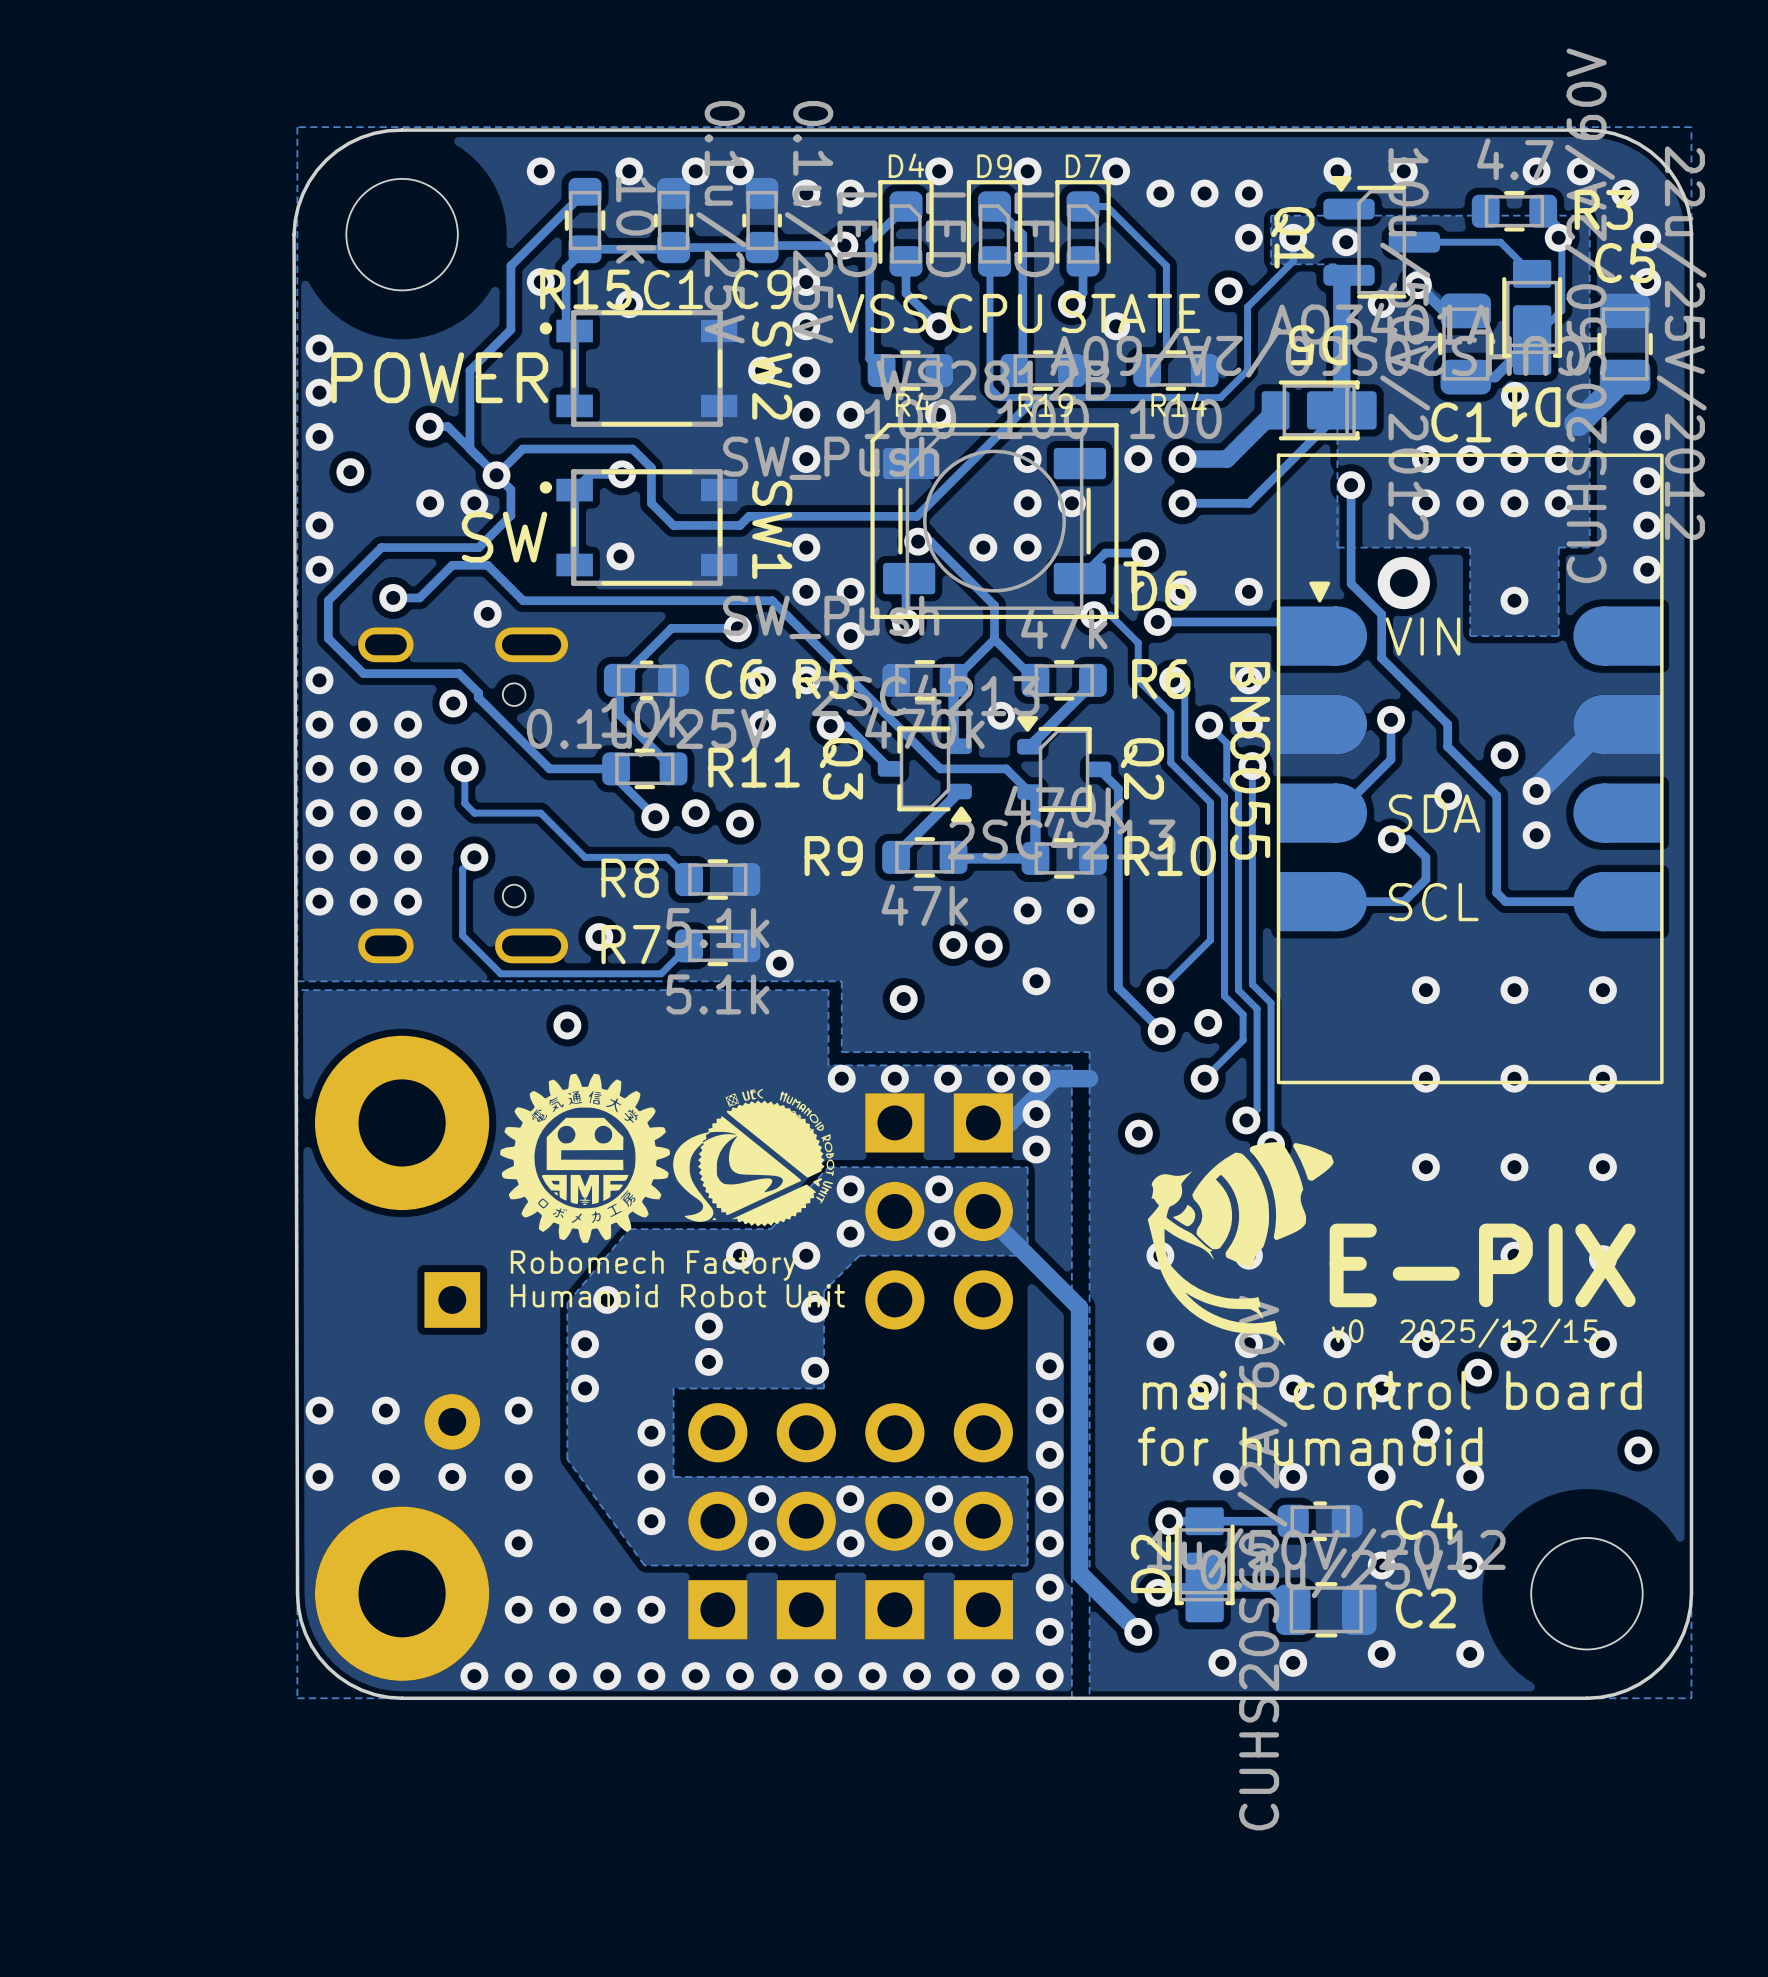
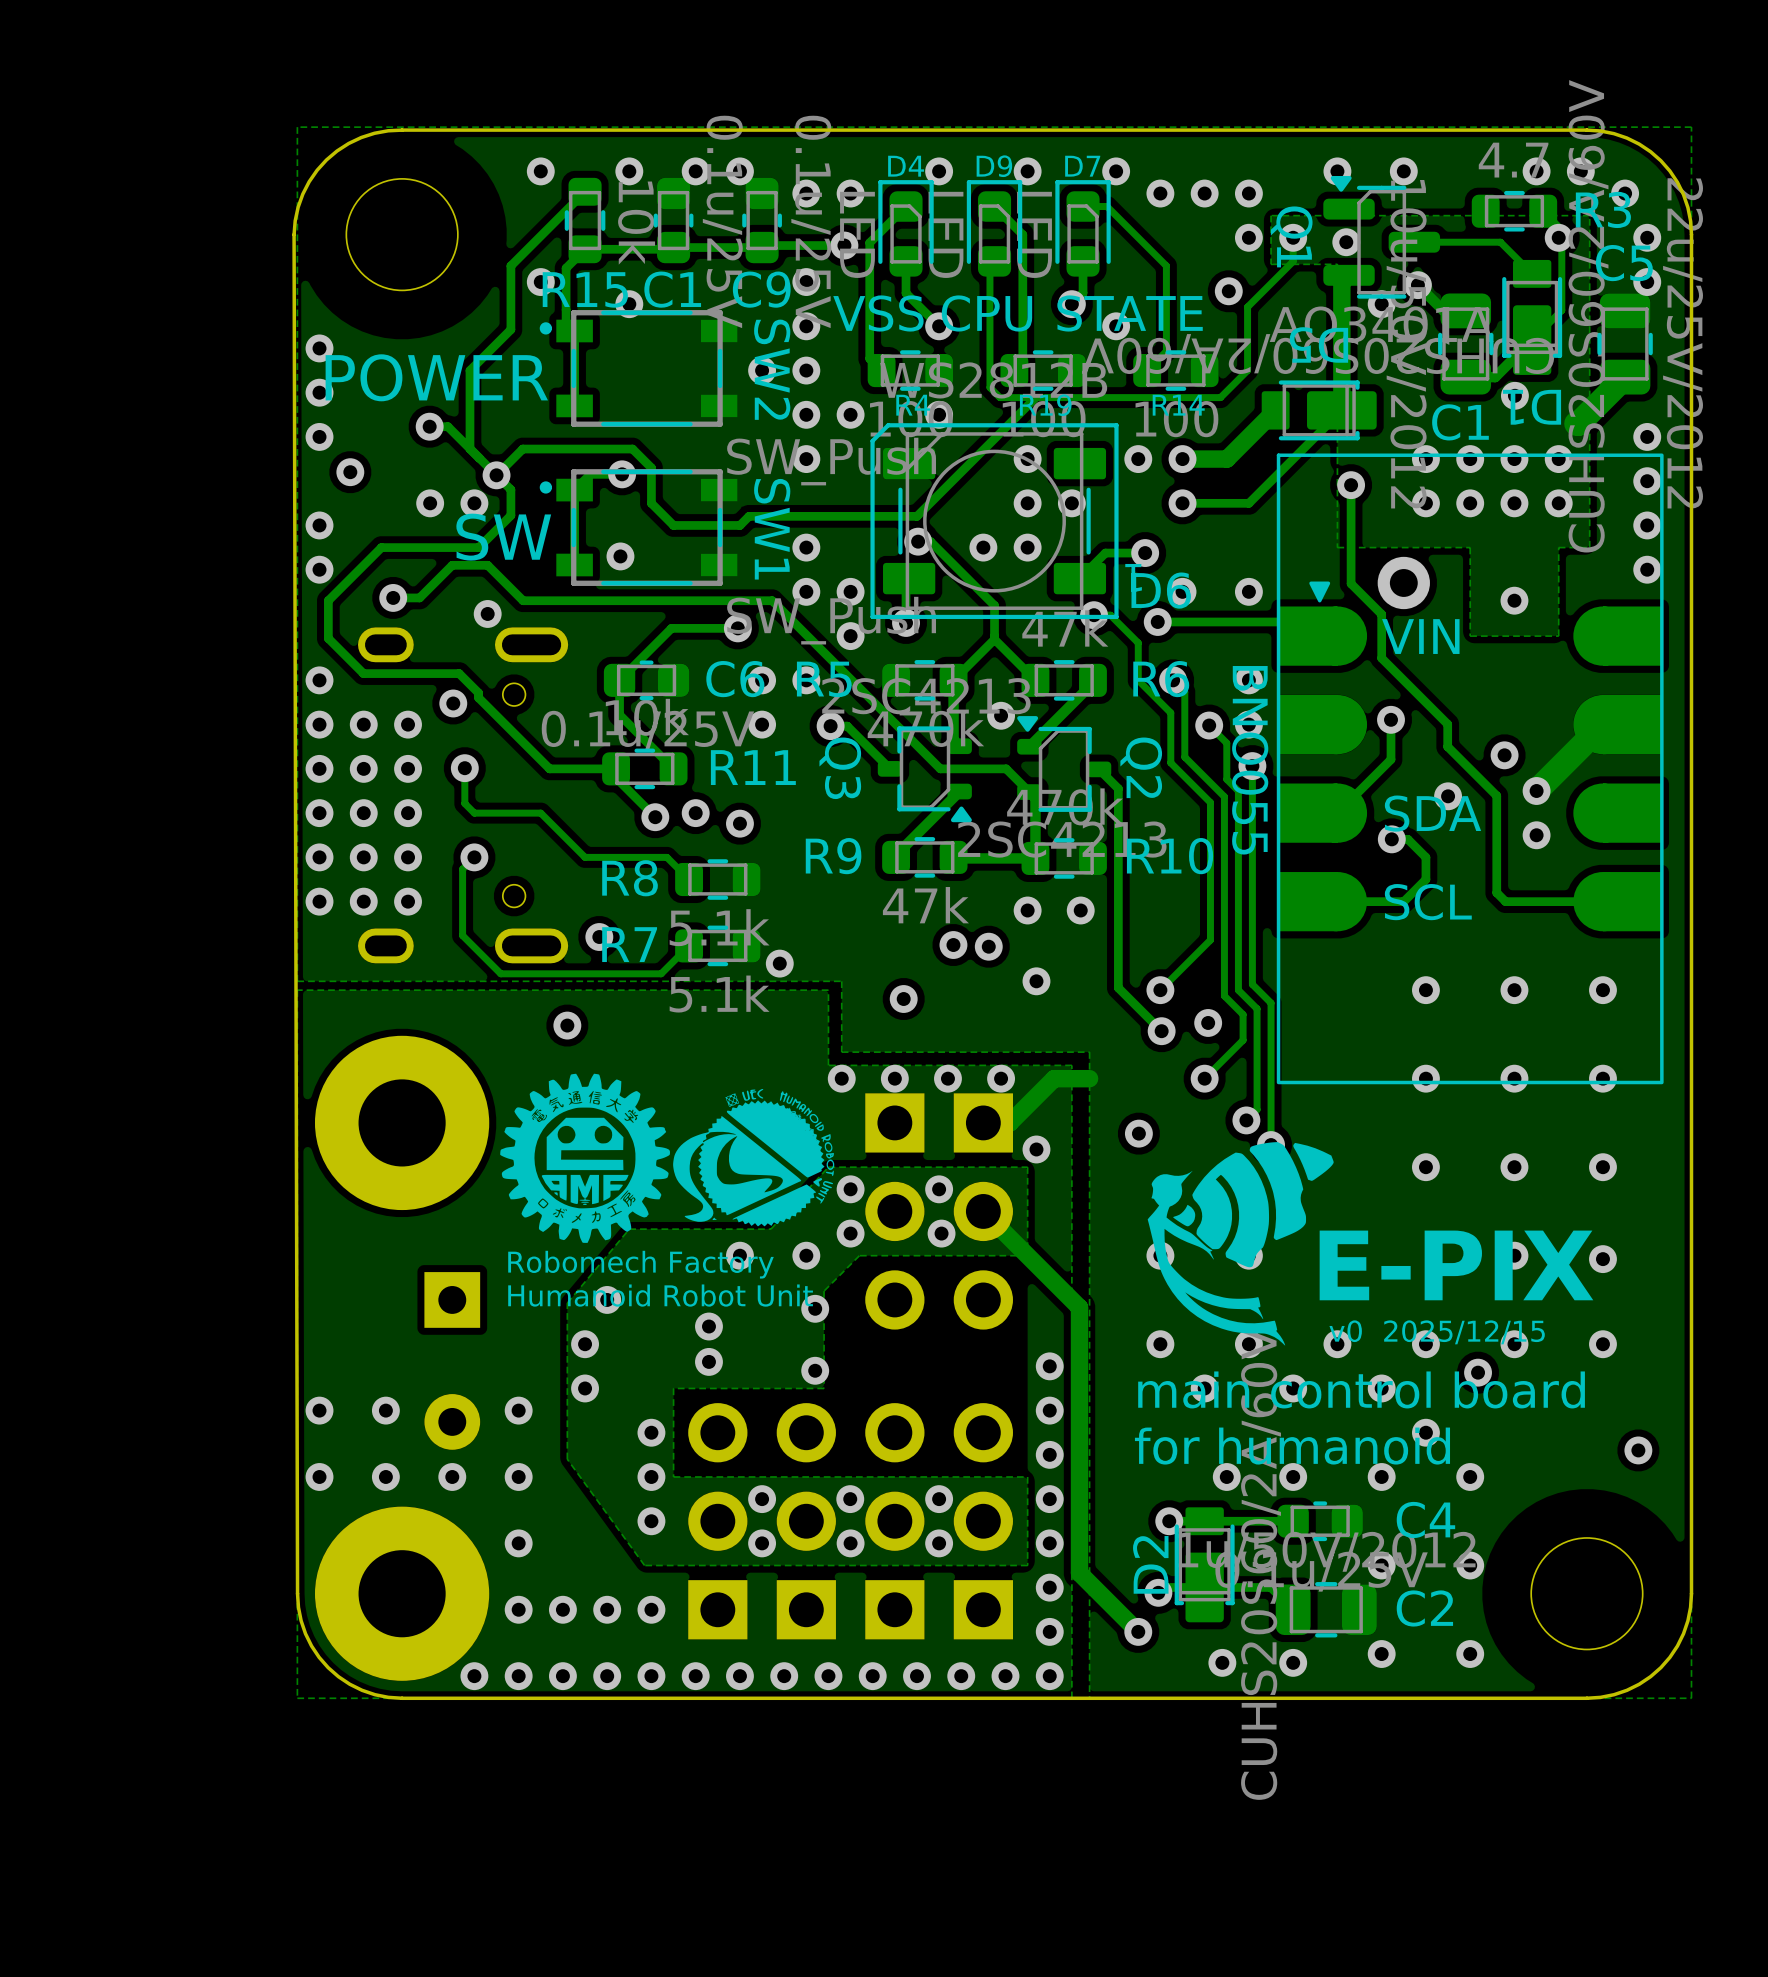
via: (1036, 1078) -> none
via: (1036, 1114) -> none

